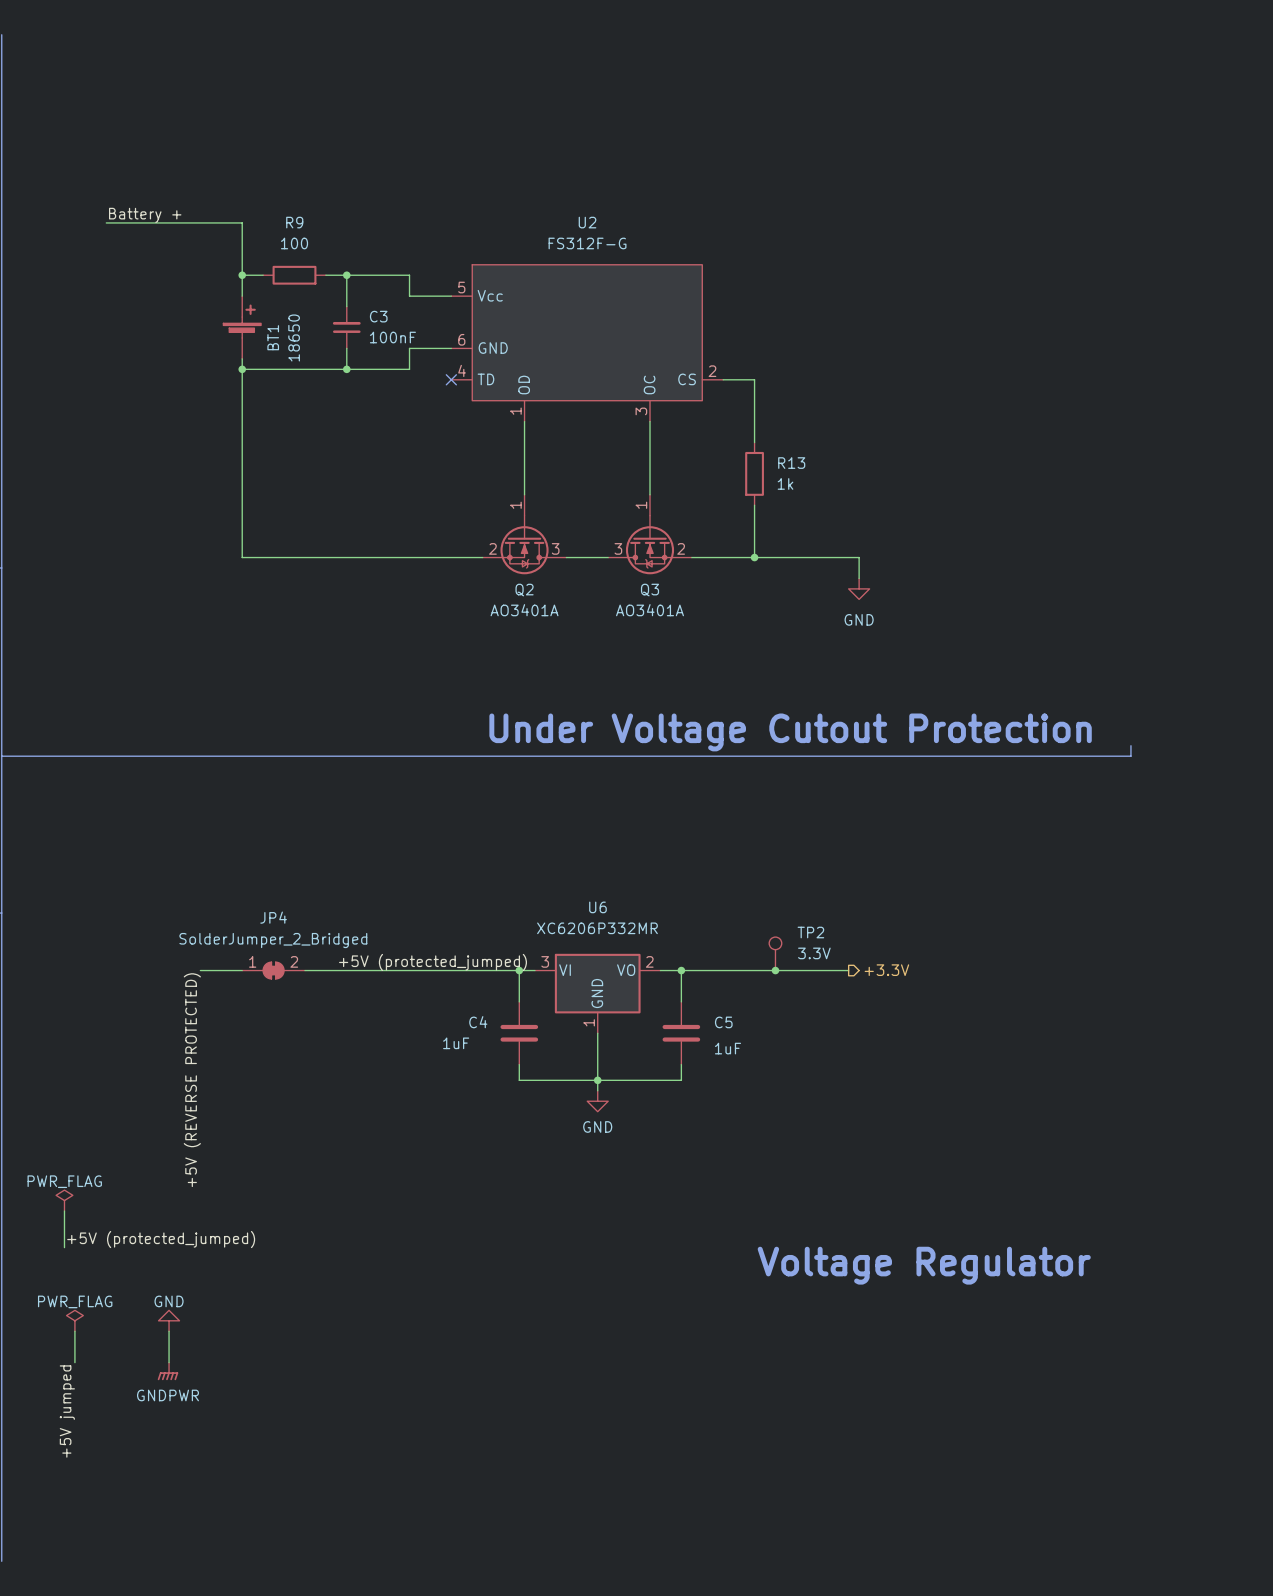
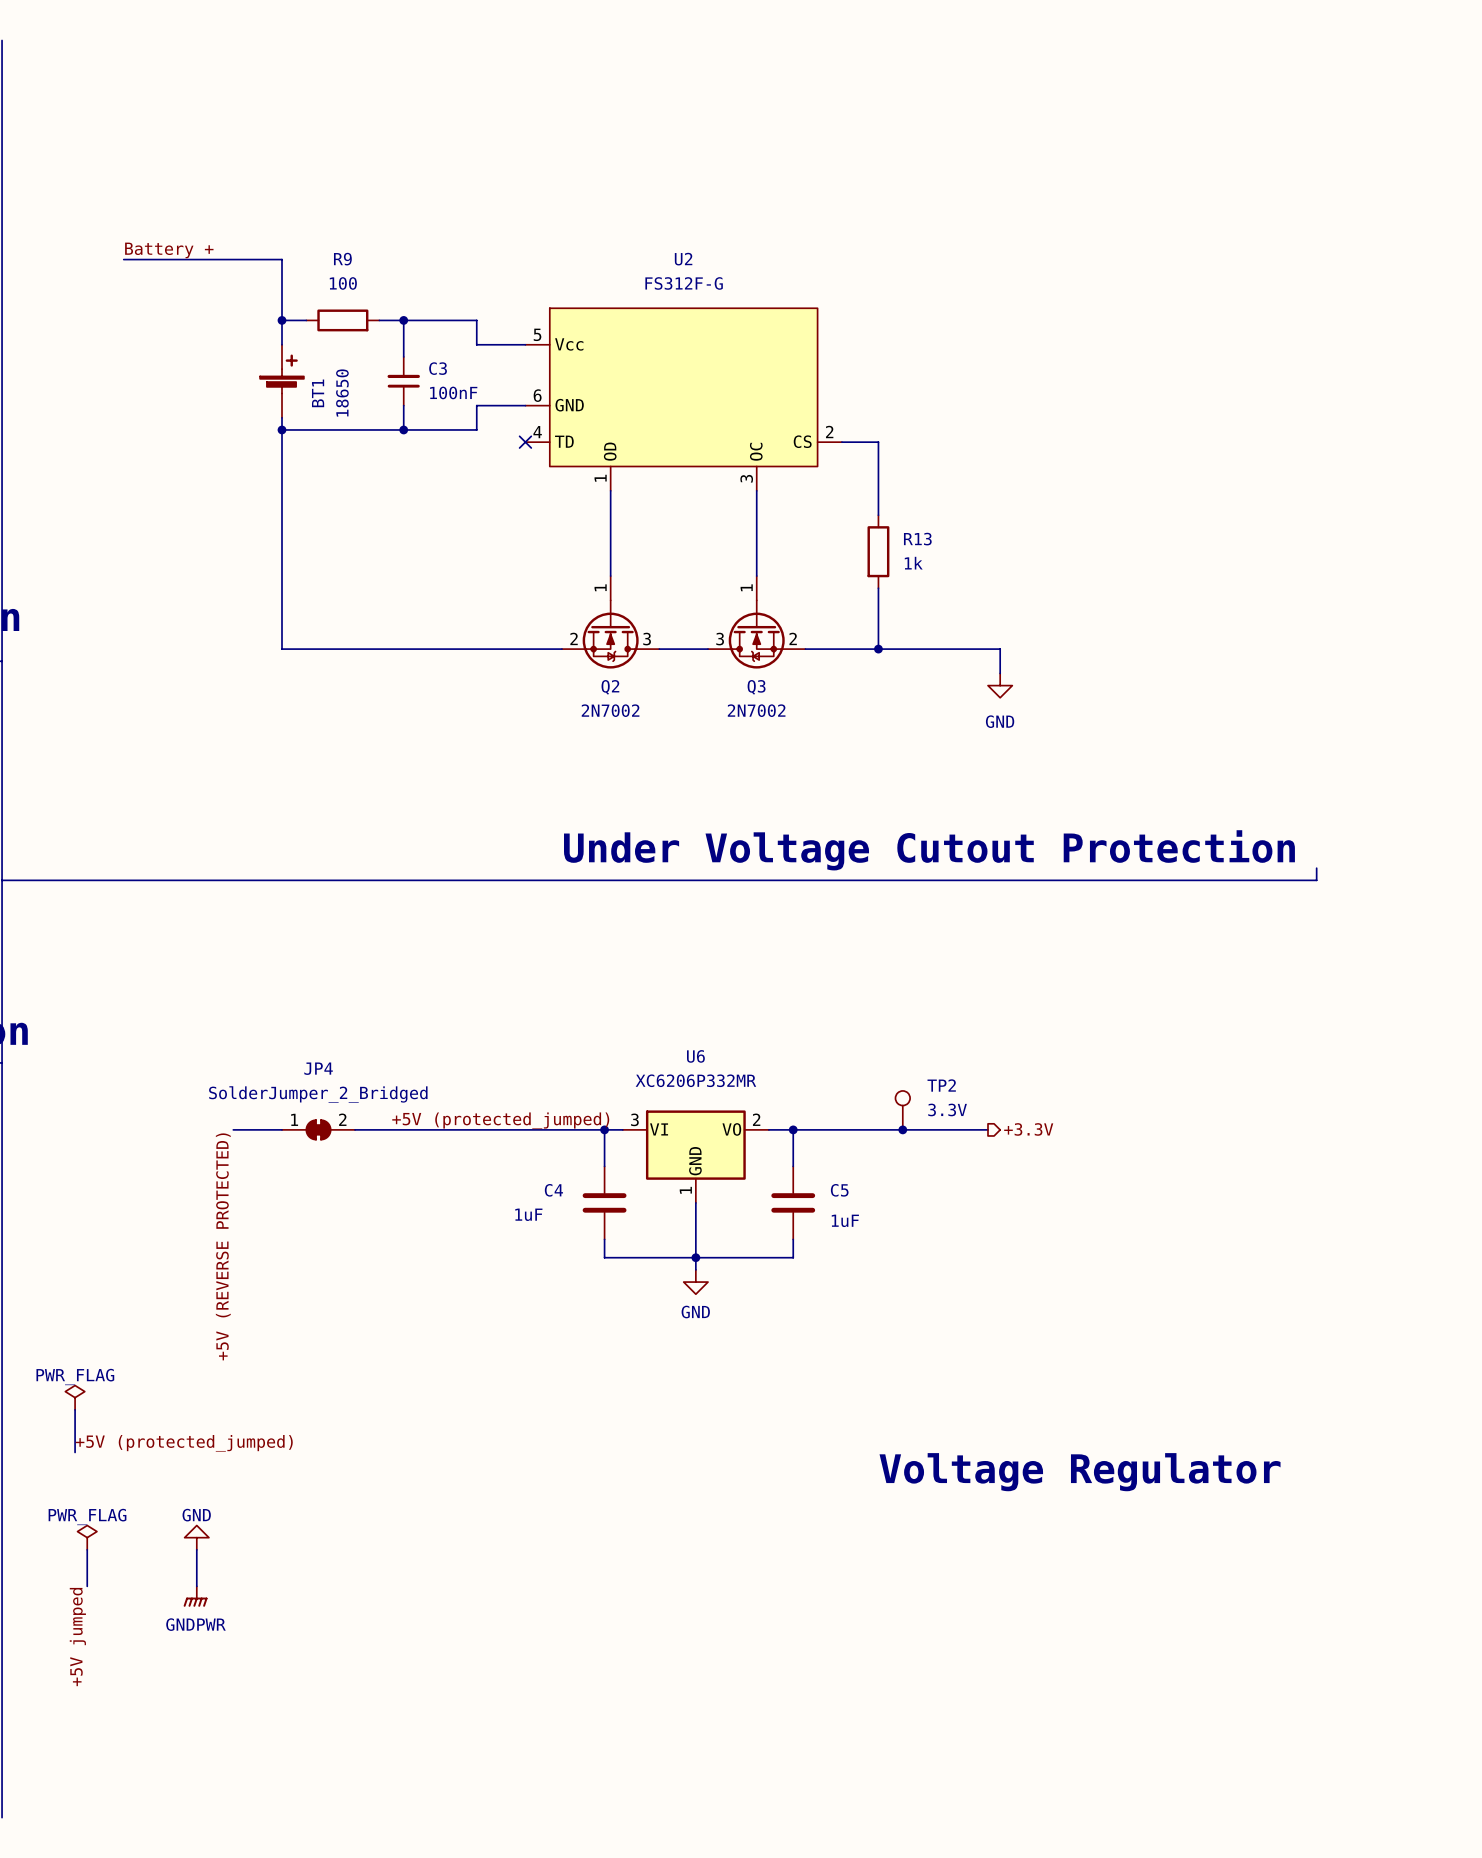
Q2 value: AO3401A (524, 610) -> 2N7002 (610, 710)
Q3 value: AO3401A (650, 610) -> 2N7002 (756, 710)

